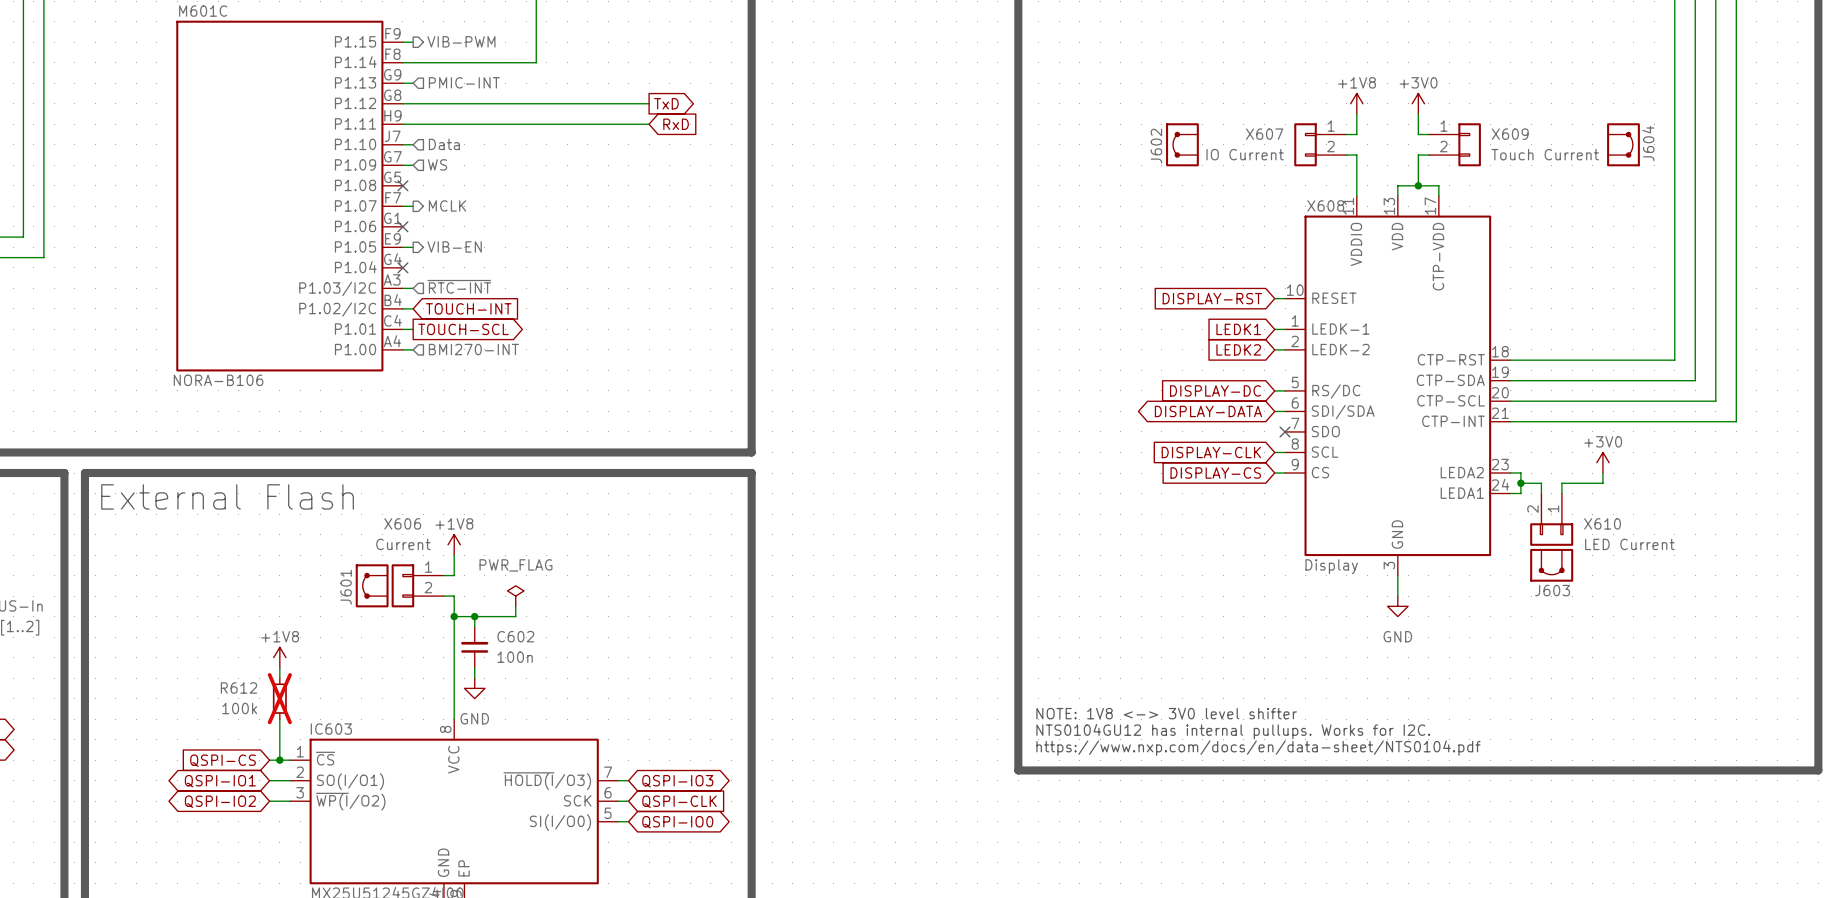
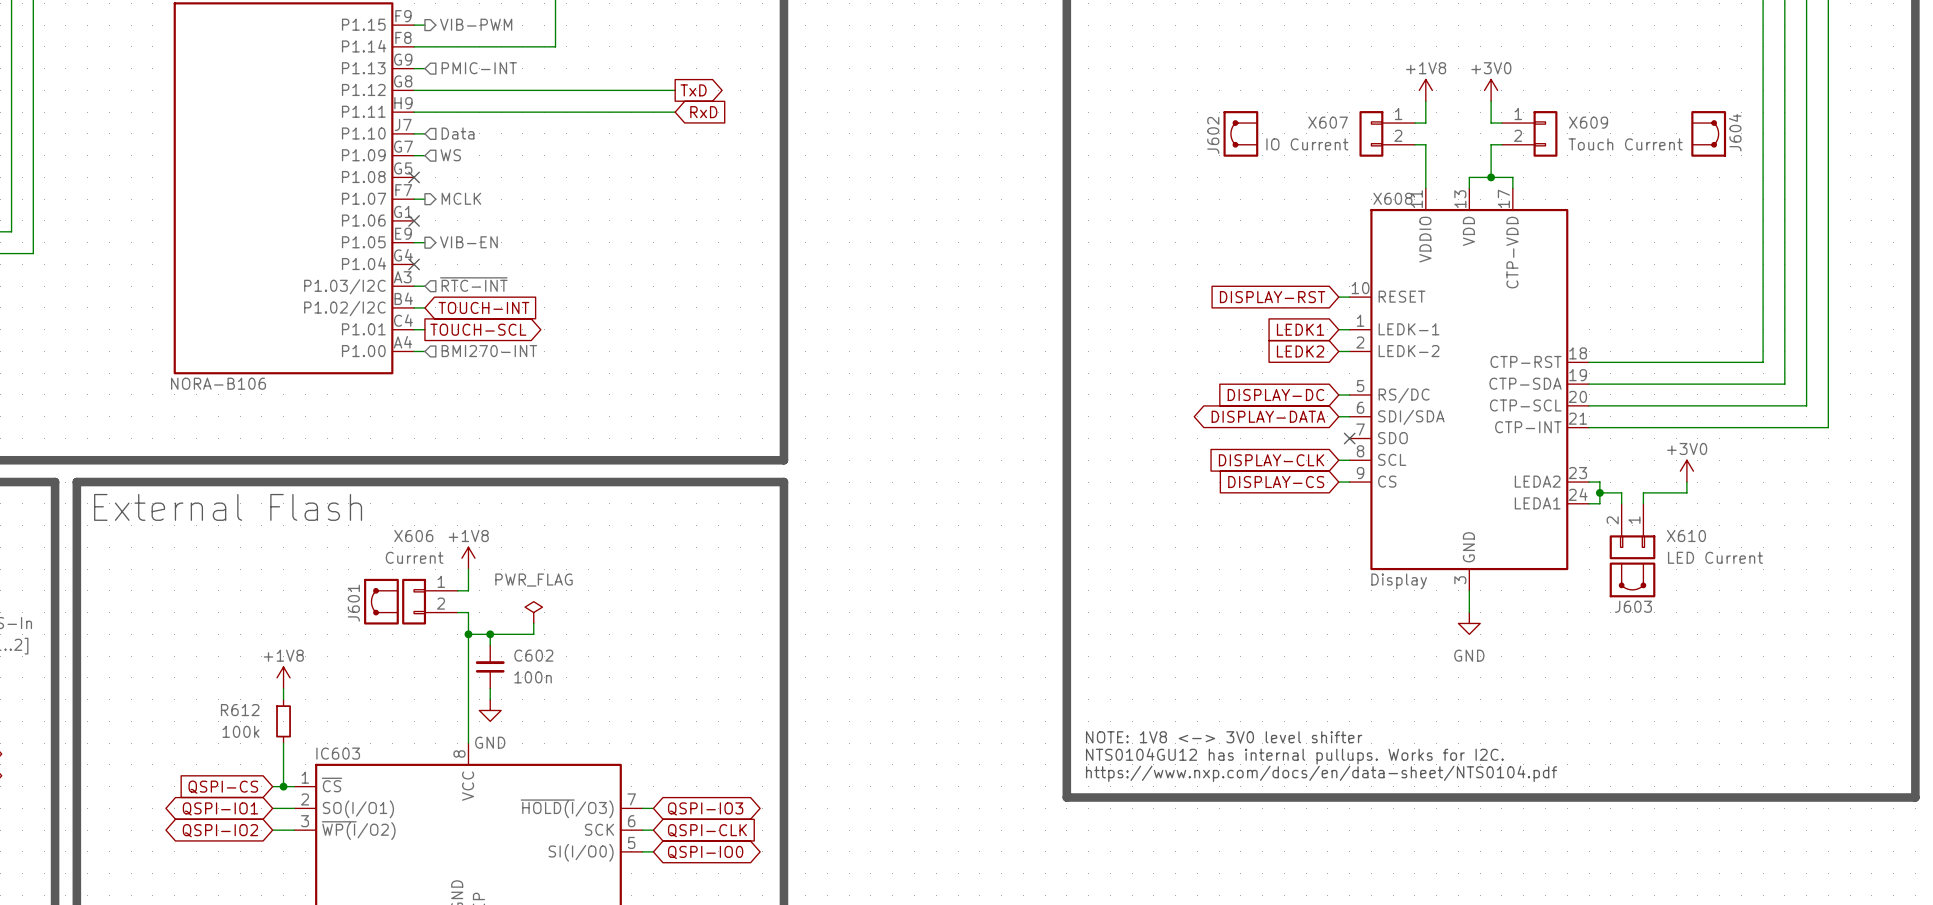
R612 do-not-place cross: (279, 698) -> none

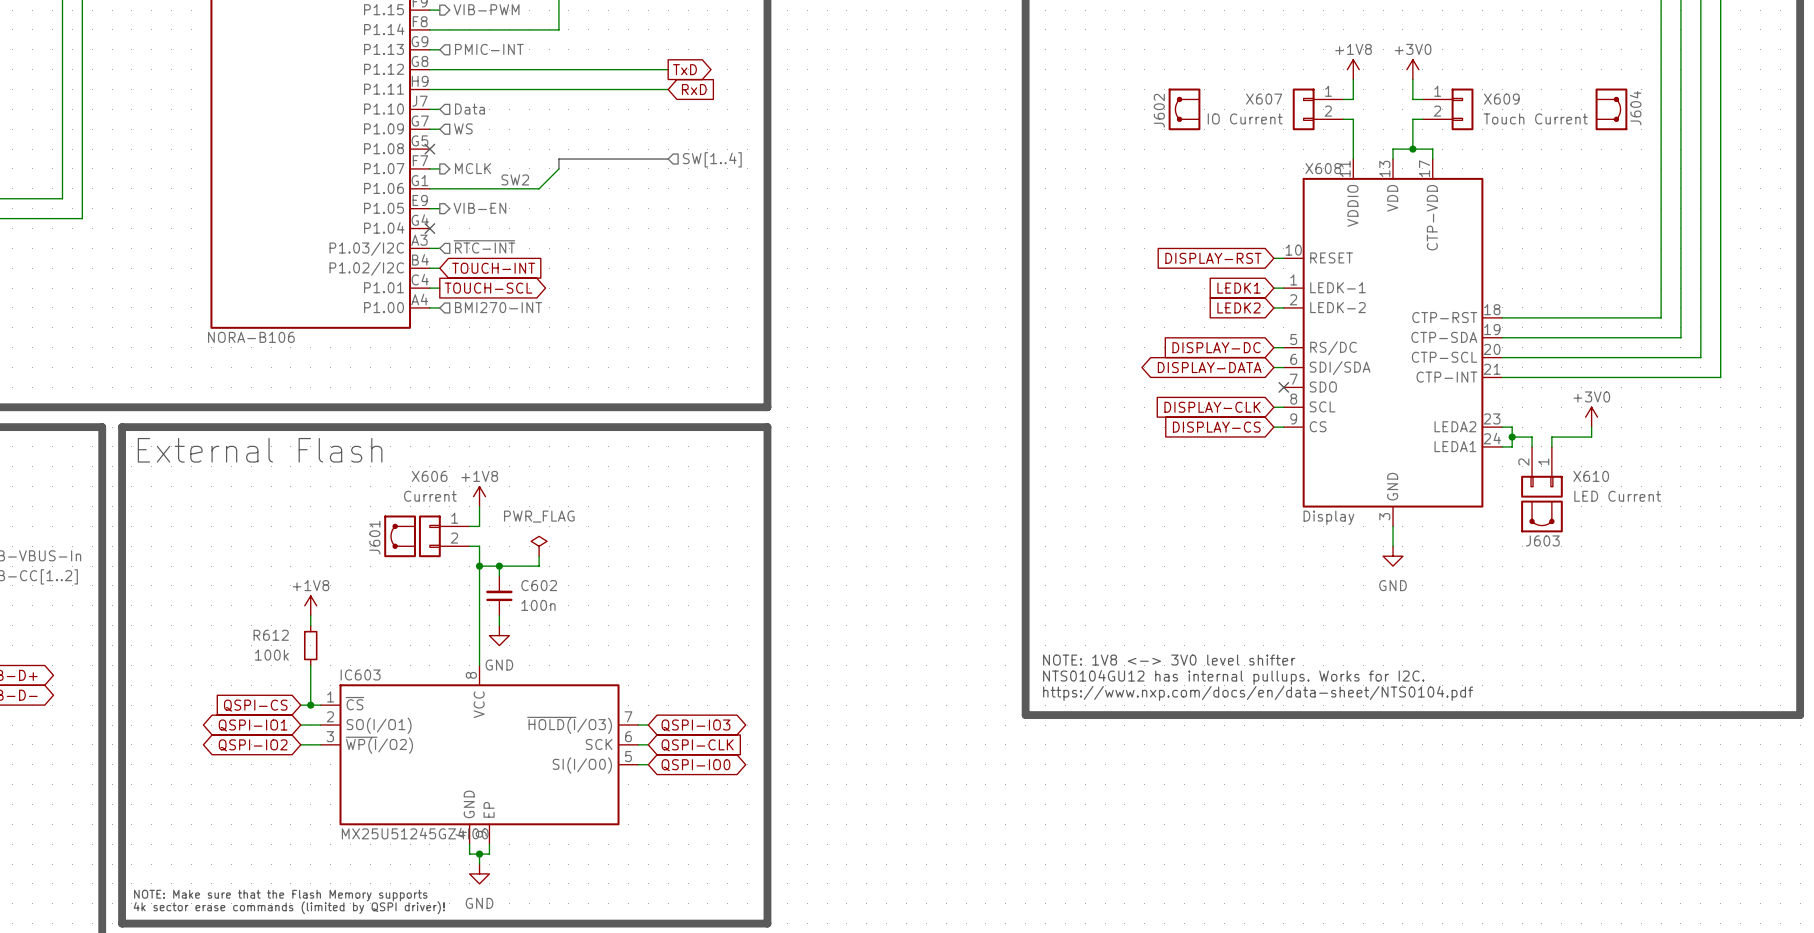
bus: none -> (668, 159) (558, 159) (558, 168)
hierarchical label: none -> SW[1..4] (712, 159)
wire: none -> (558, 168) (539, 188) (429, 188)
label: none -> SW2 (515, 179)
no-connect mark: (414, 220) -> none

